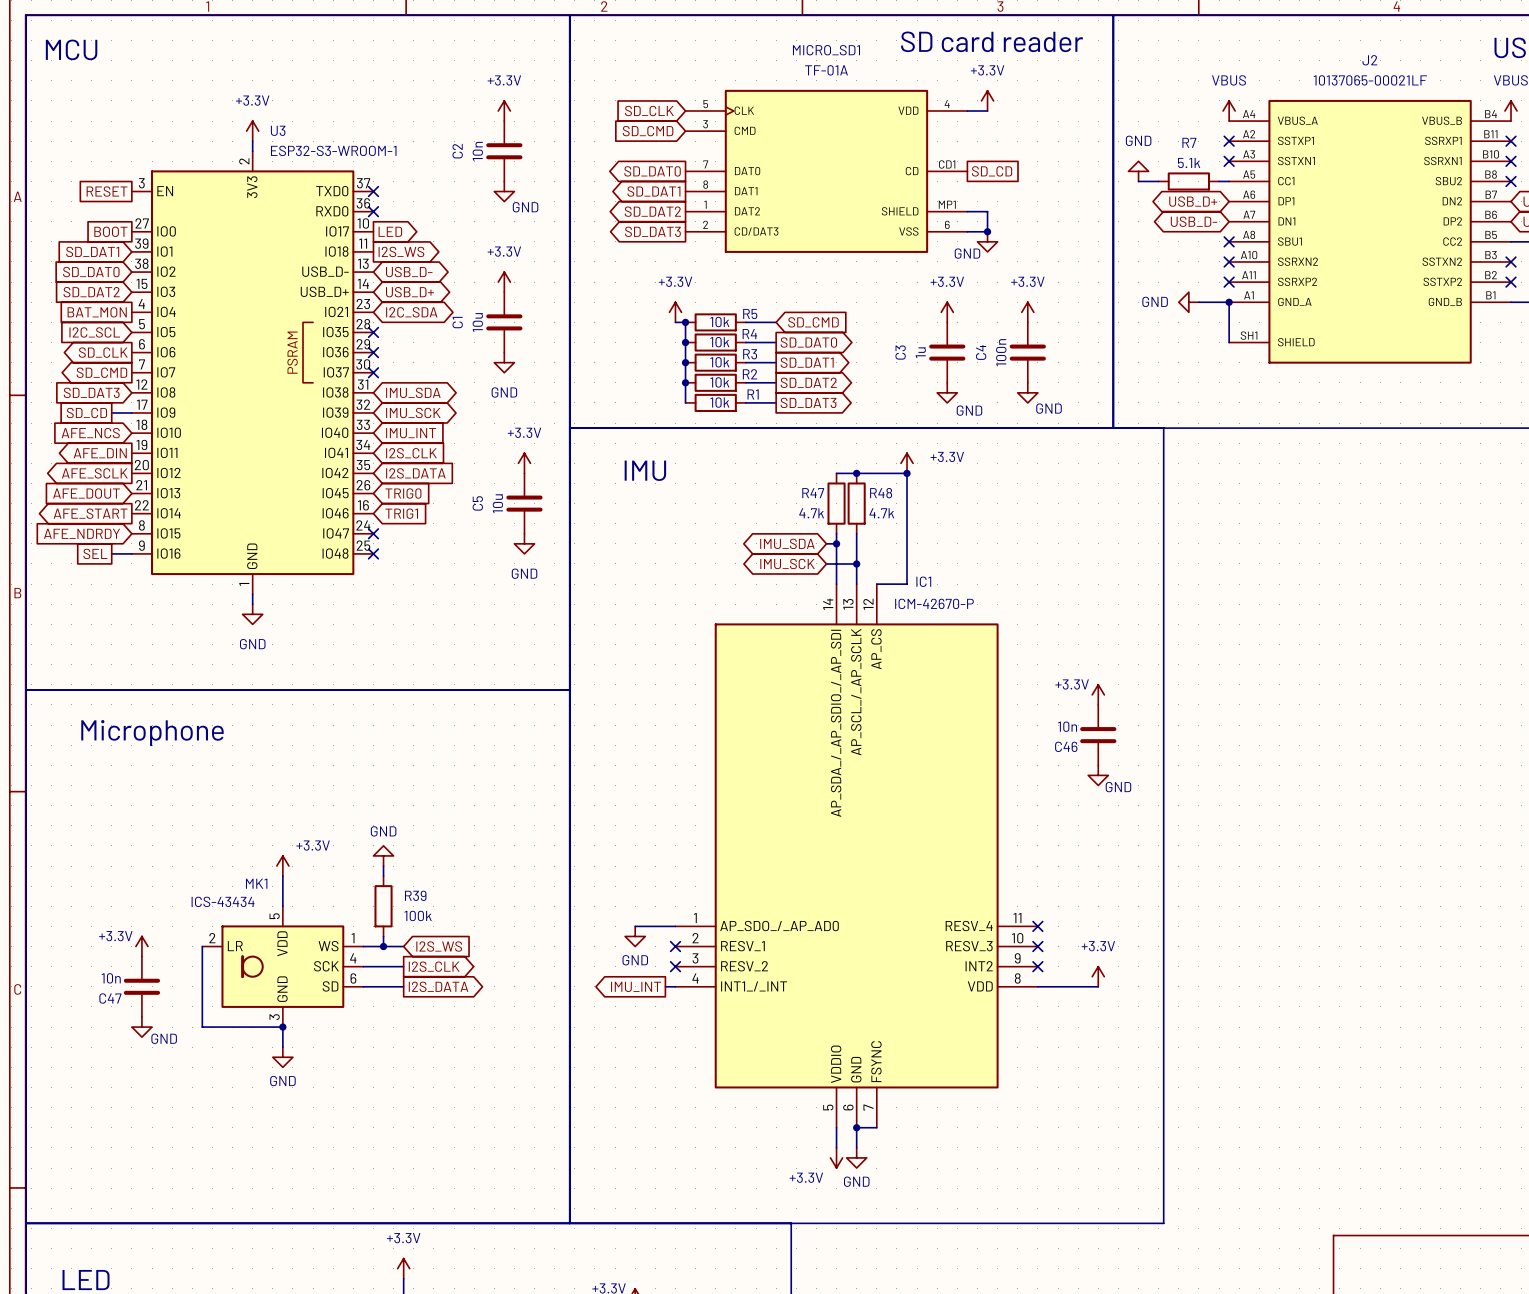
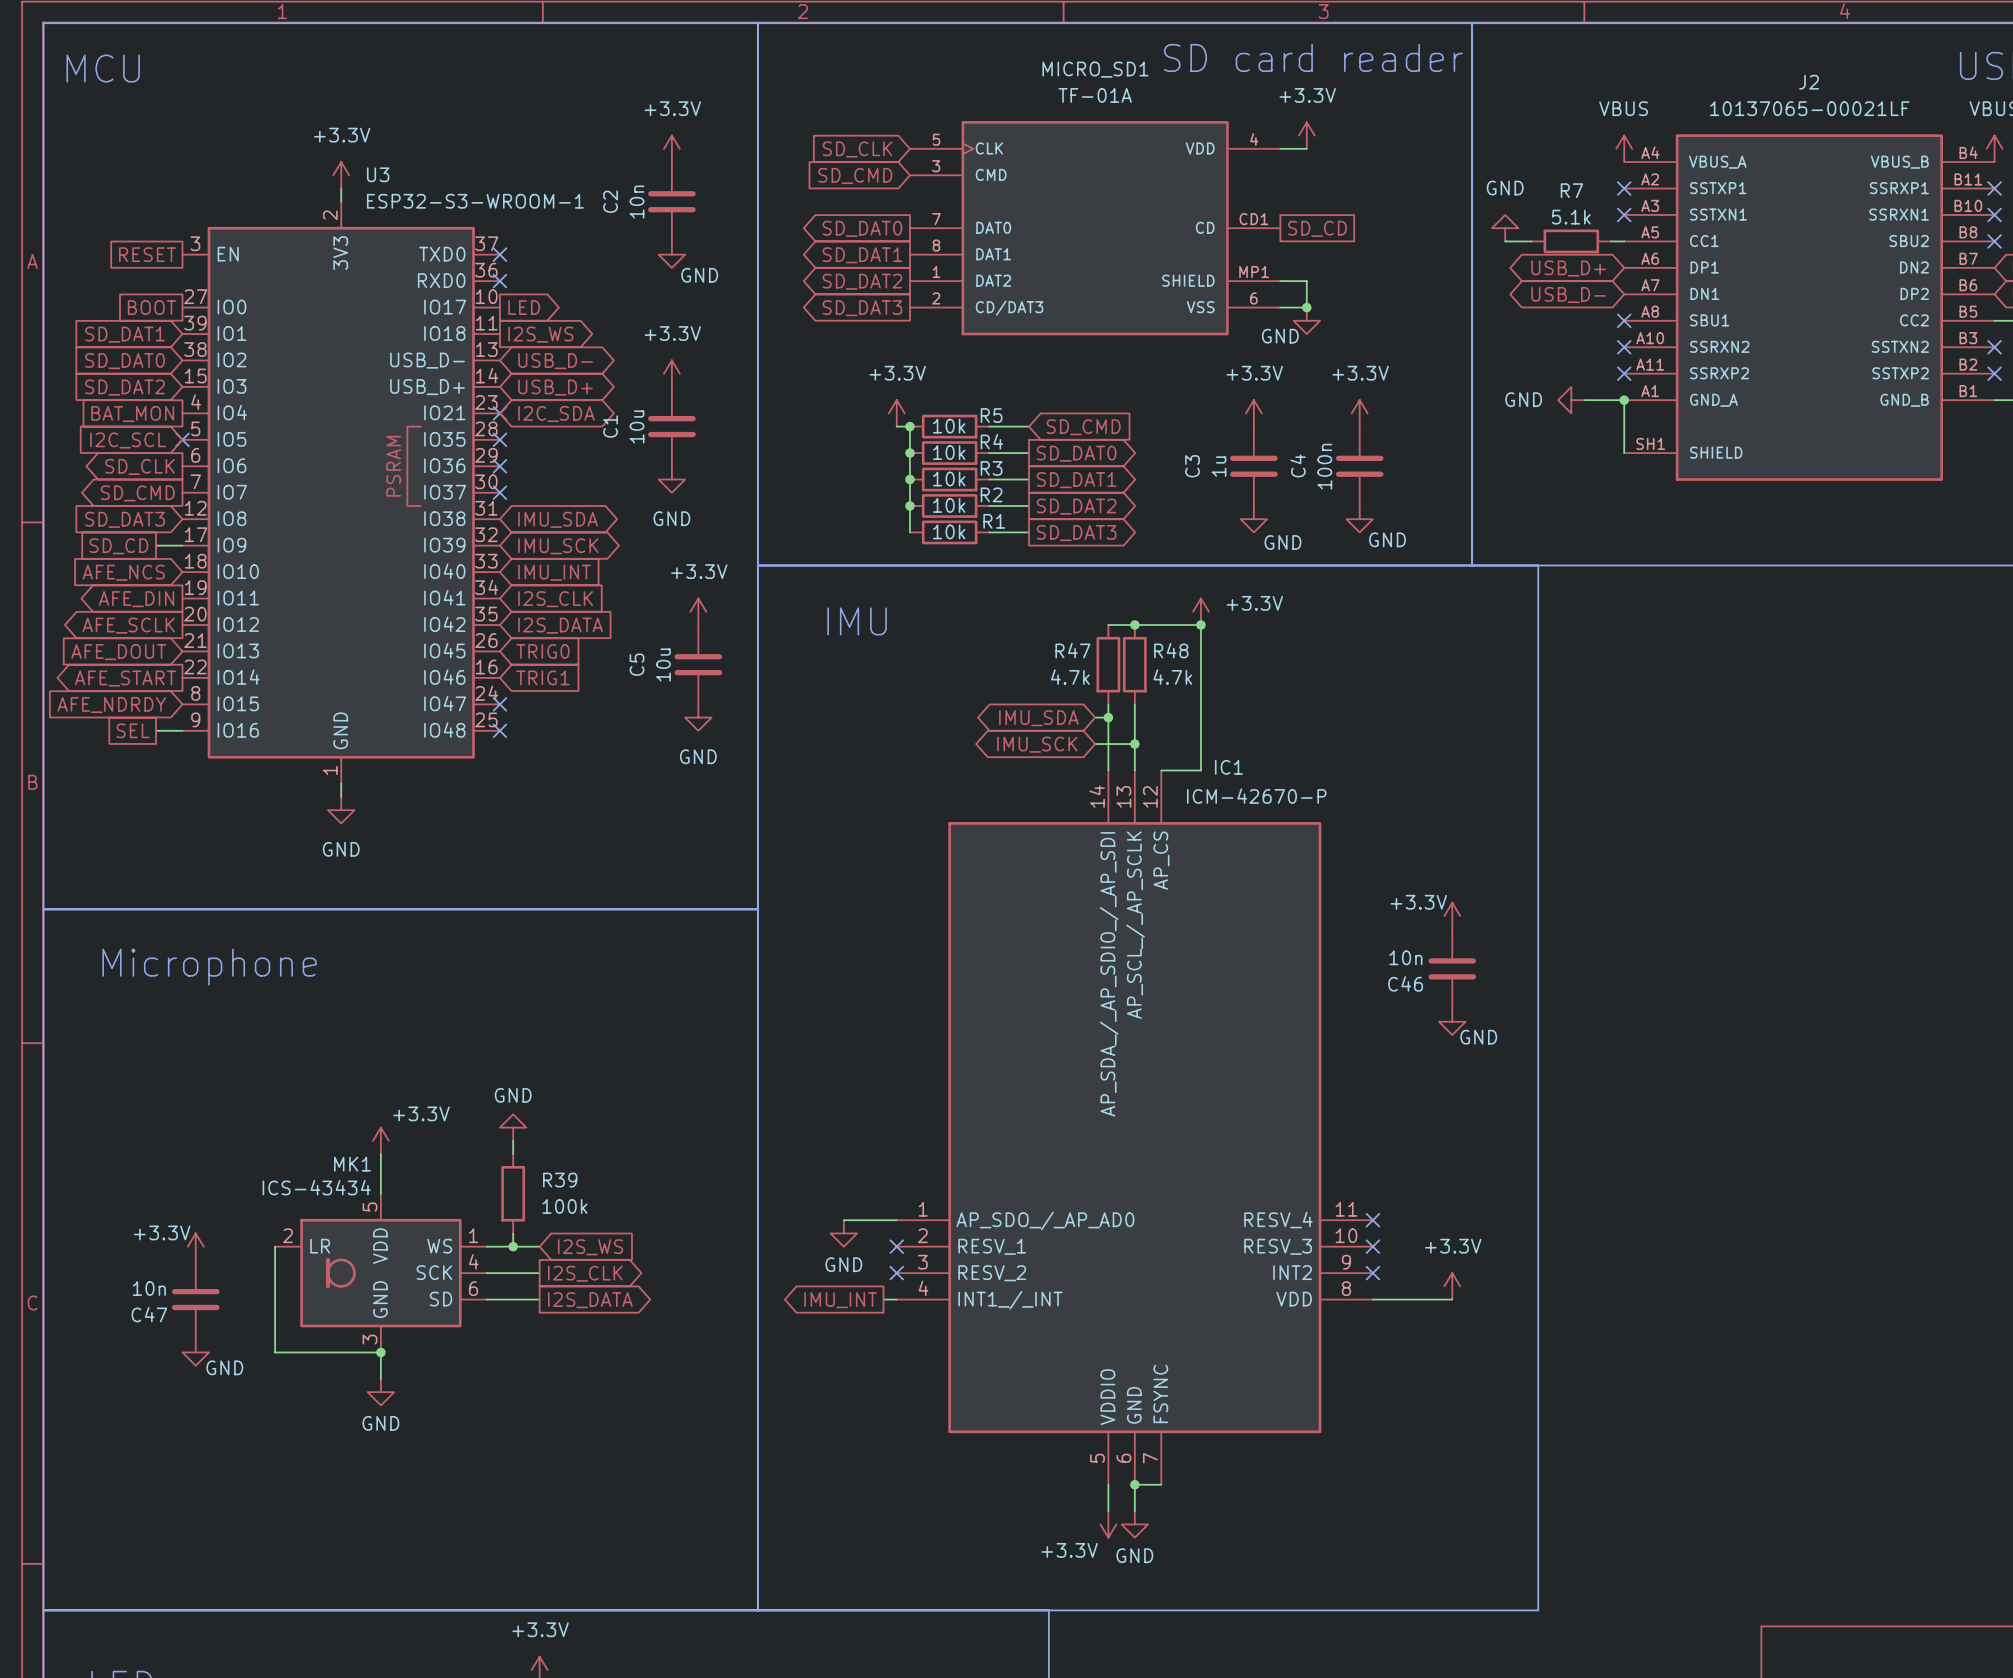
no-connect mark: none -> (499, 413)
no-connect mark: none -> (182, 439)

